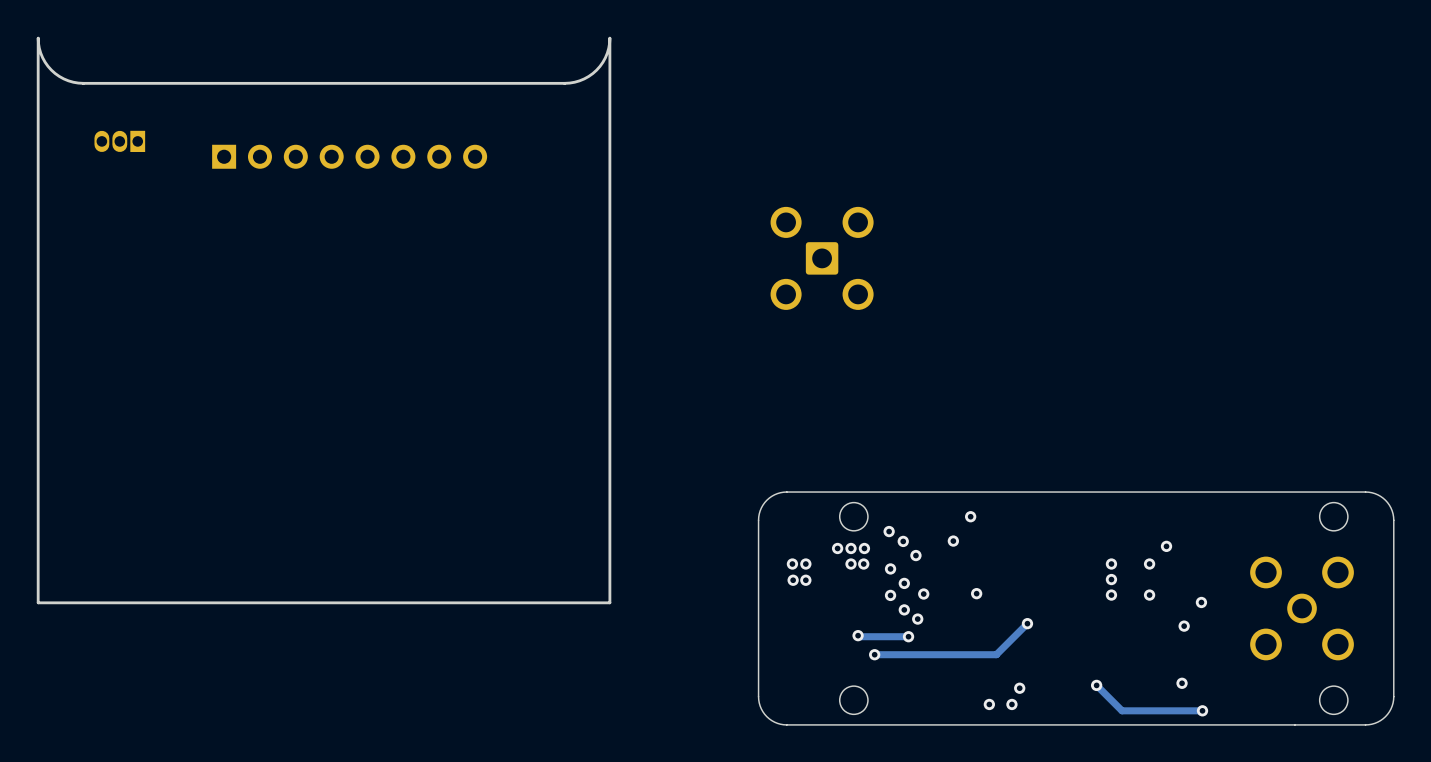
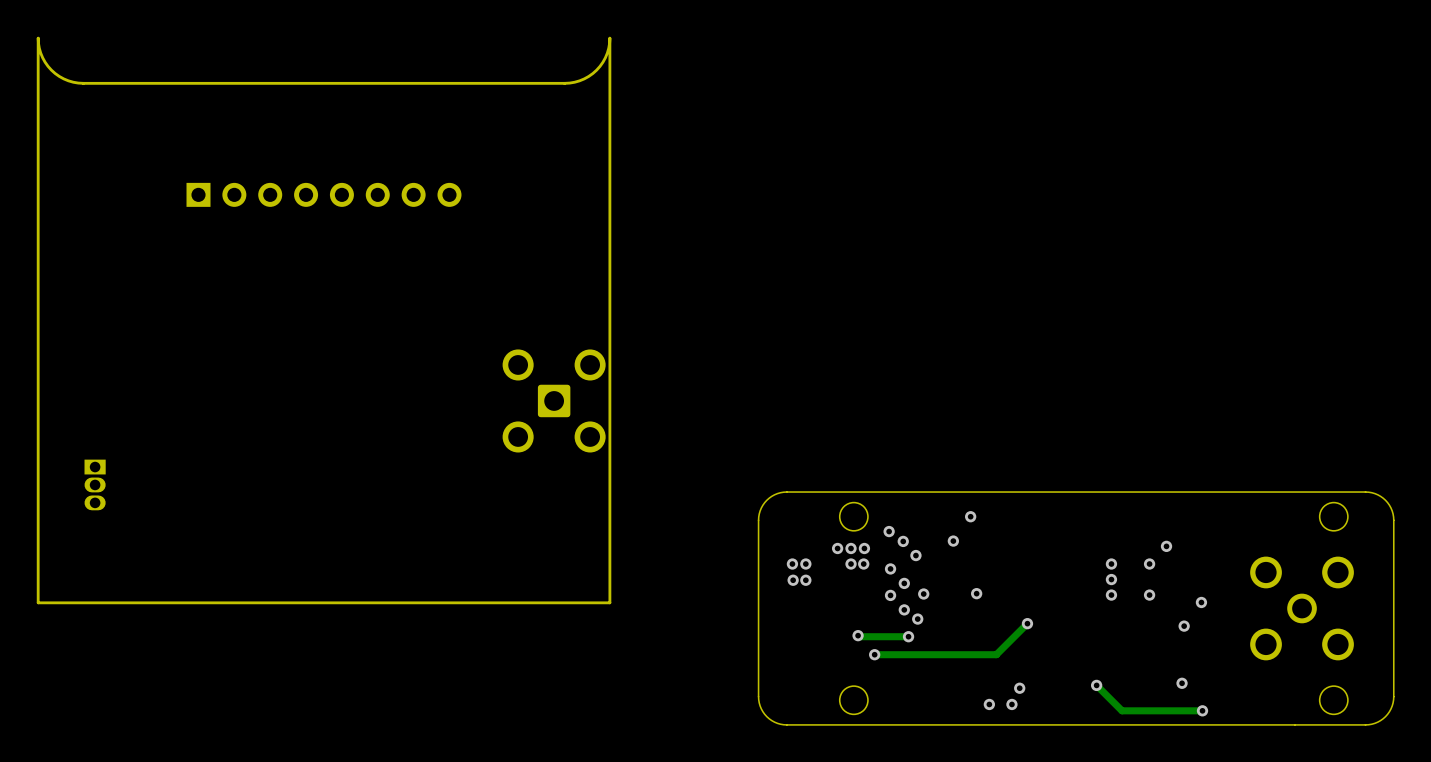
part rotation: 0° (119, 141) -> 90° counterclockwise (95, 484)
part position: (119, 141) -> (95, 484)
part position: (349, 156) -> (323, 194)
part position: (822, 258) -> (554, 400)

